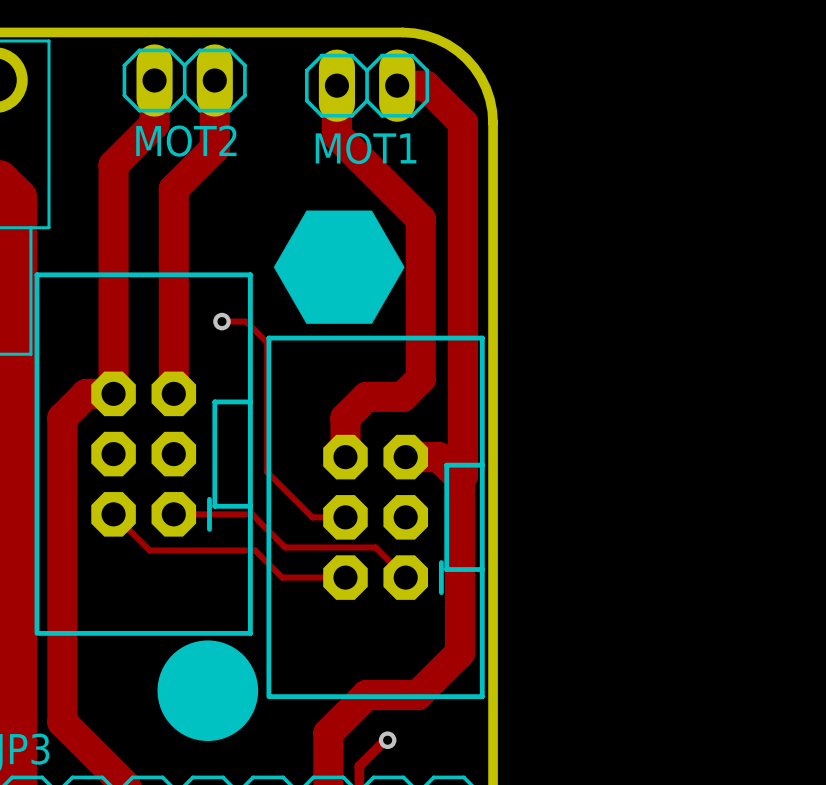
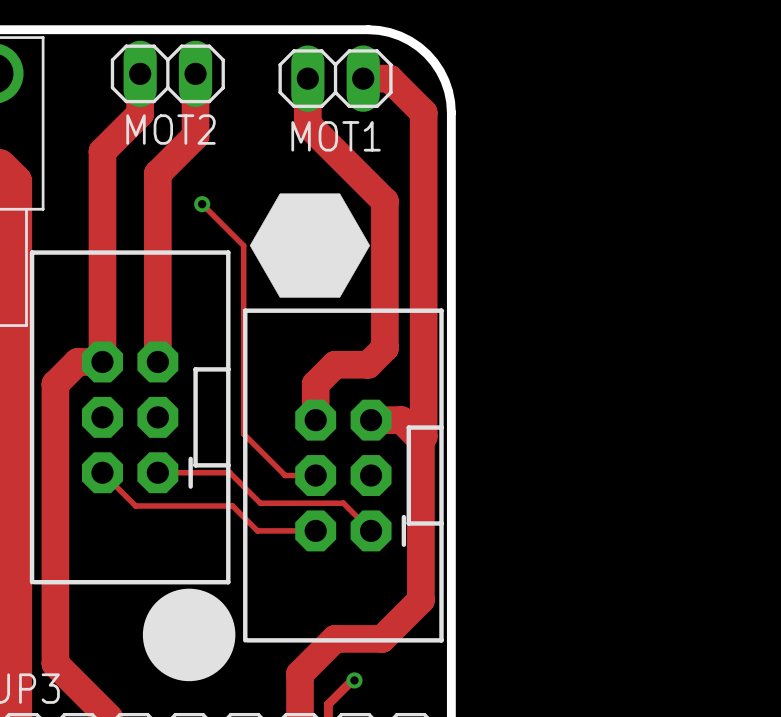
track: (221, 321) (246, 321) (267, 342) -> (202, 204) (243, 245) (243, 314)
via position: (221, 321) -> (202, 204)

